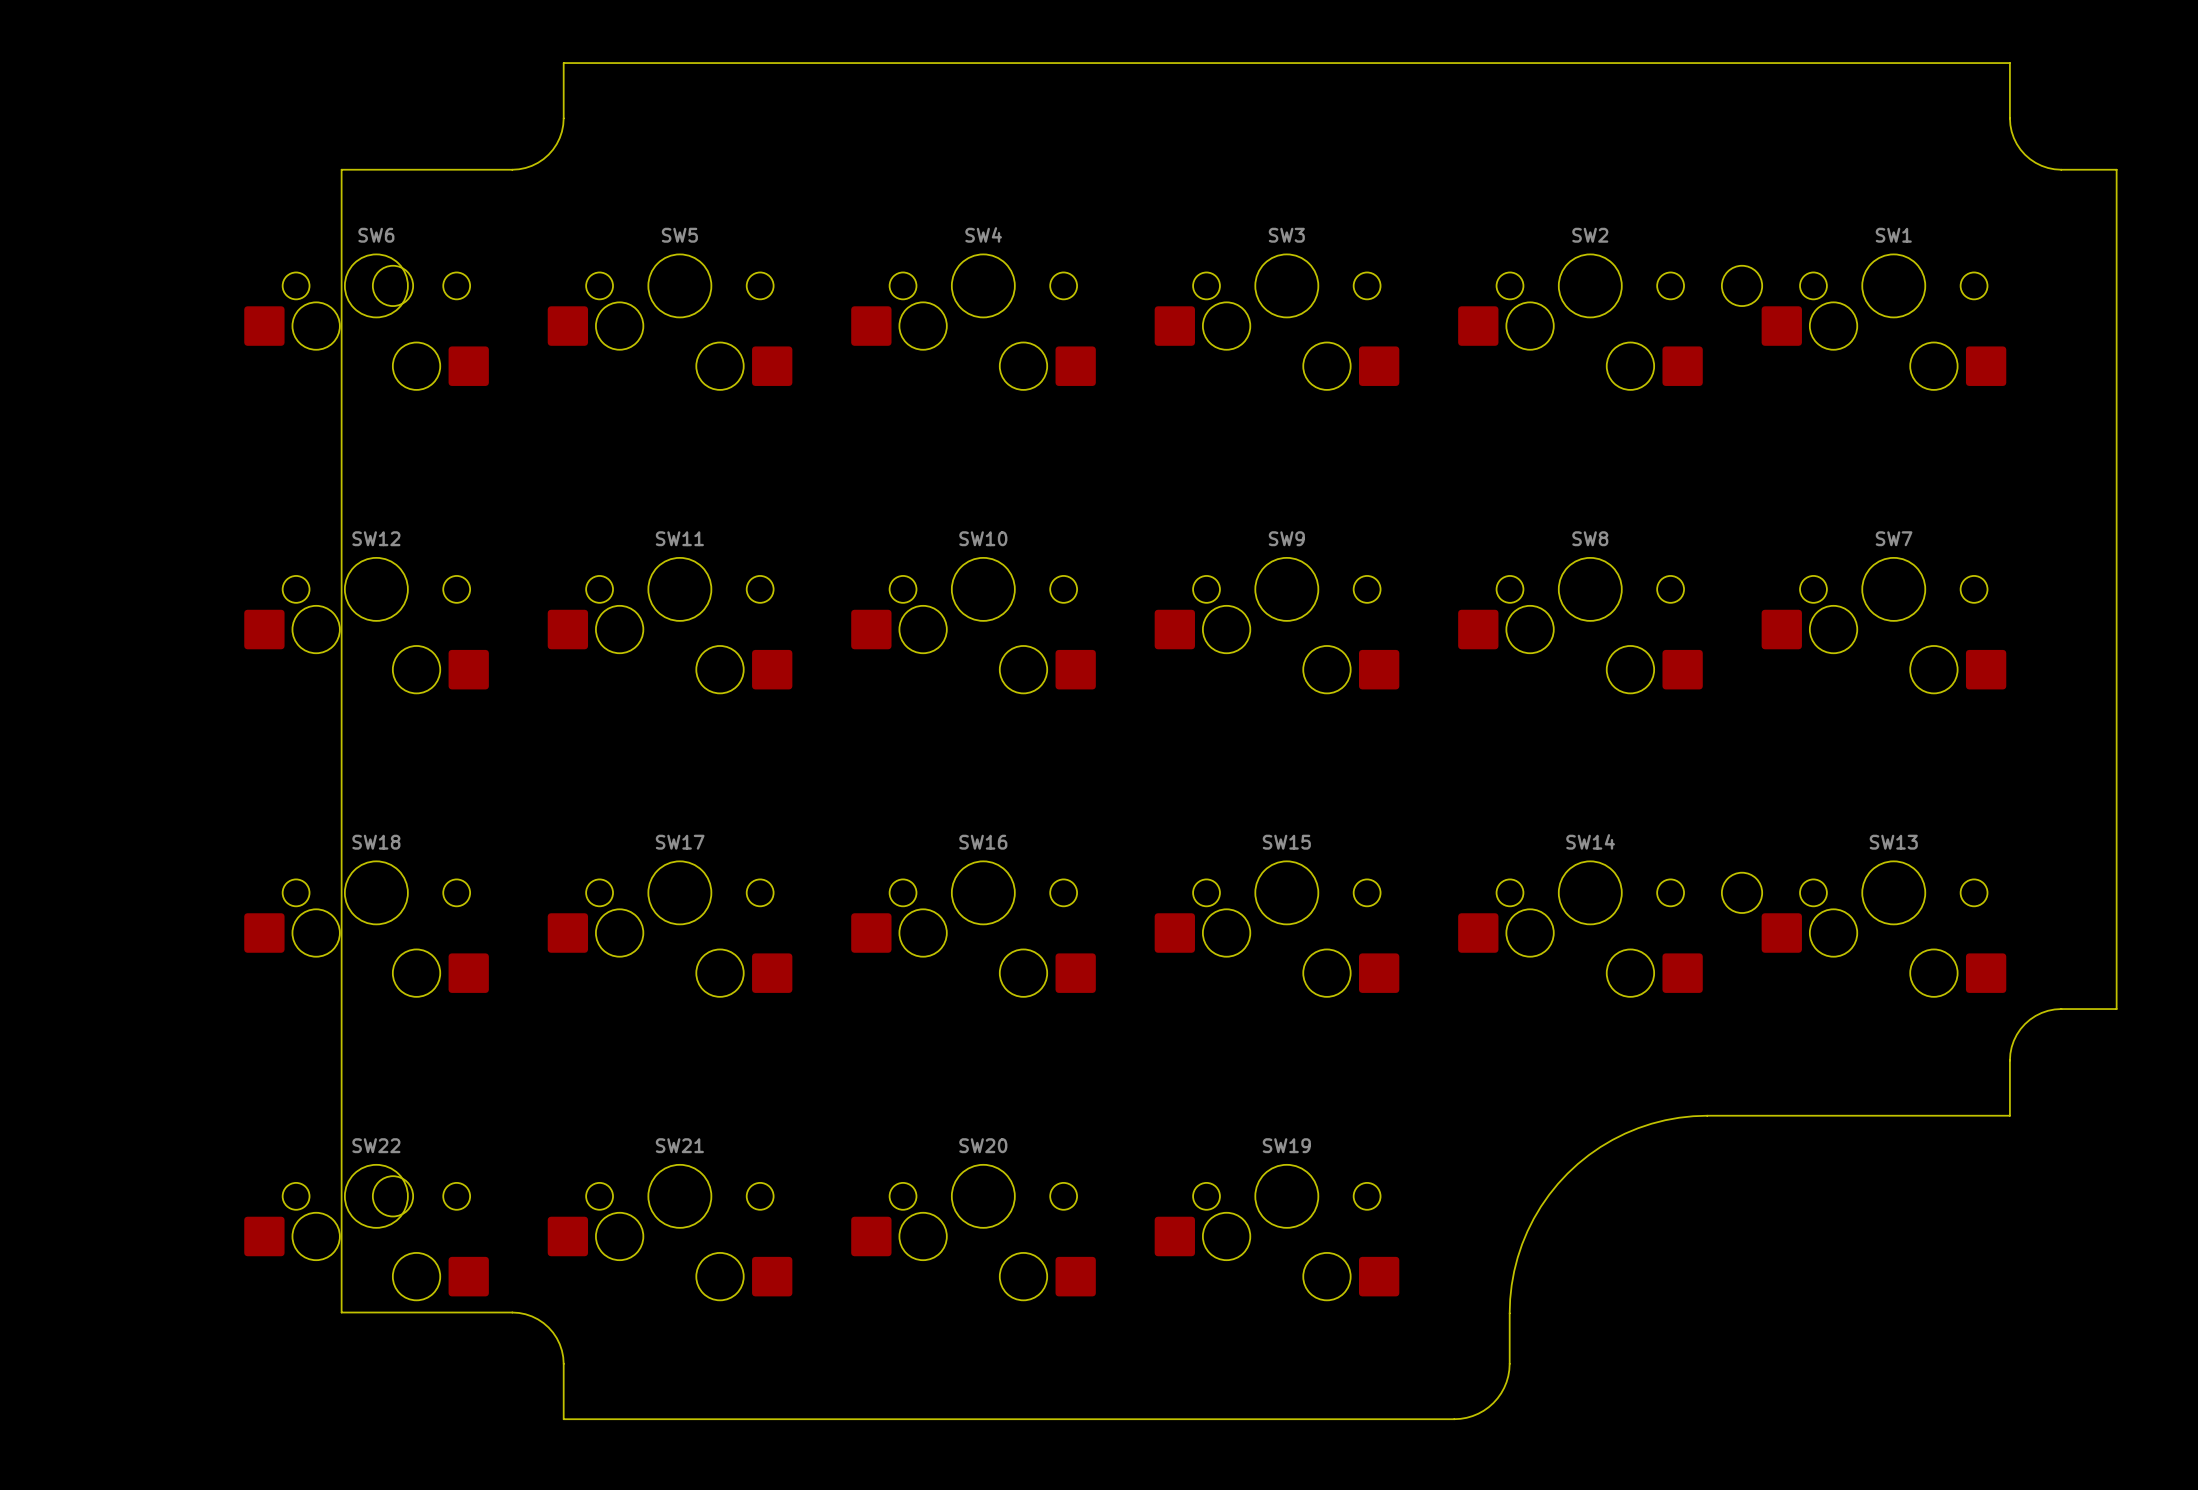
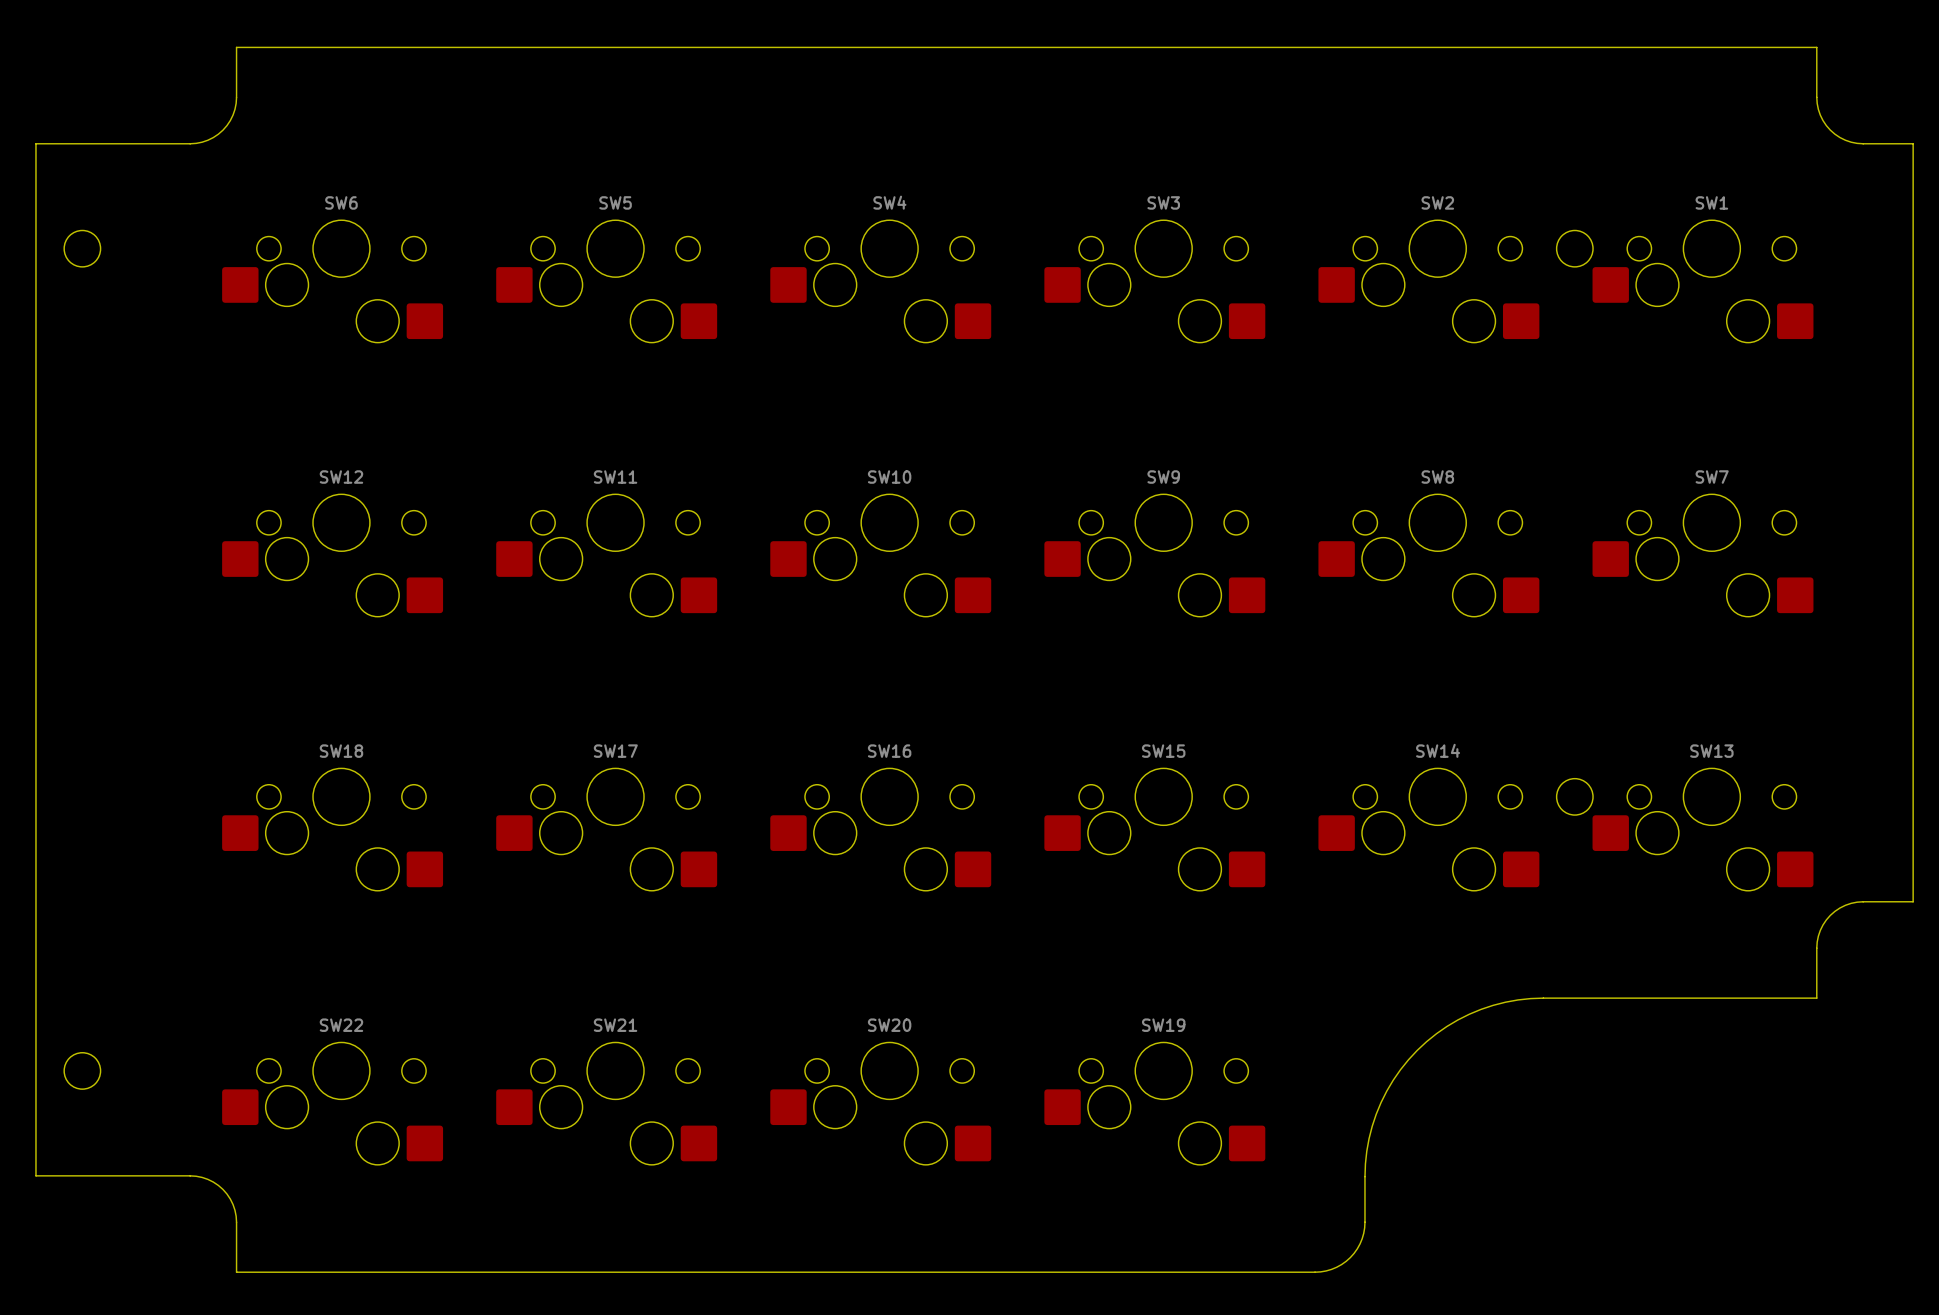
board edge: (563, 63) (561, 131) (556, 144) (548, 154) (531, 165) (512, 169) (341, 169) (341, 1312) (512, 1312) (531, 1316) (543, 1323) (553, 1332) (561, 1350) (563, 1419) -> (510, 47) (236, 47) (234, 109) (226, 125) (218, 134) (207, 140) (190, 143) (35, 143) (35, 1175) (190, 1175) (207, 1179) (218, 1185) (226, 1194) (234, 1210) (236, 1272) (510, 1272)
round board edge position: (392, 285) -> (82, 248)
round board edge position: (392, 1196) -> (82, 1070)

